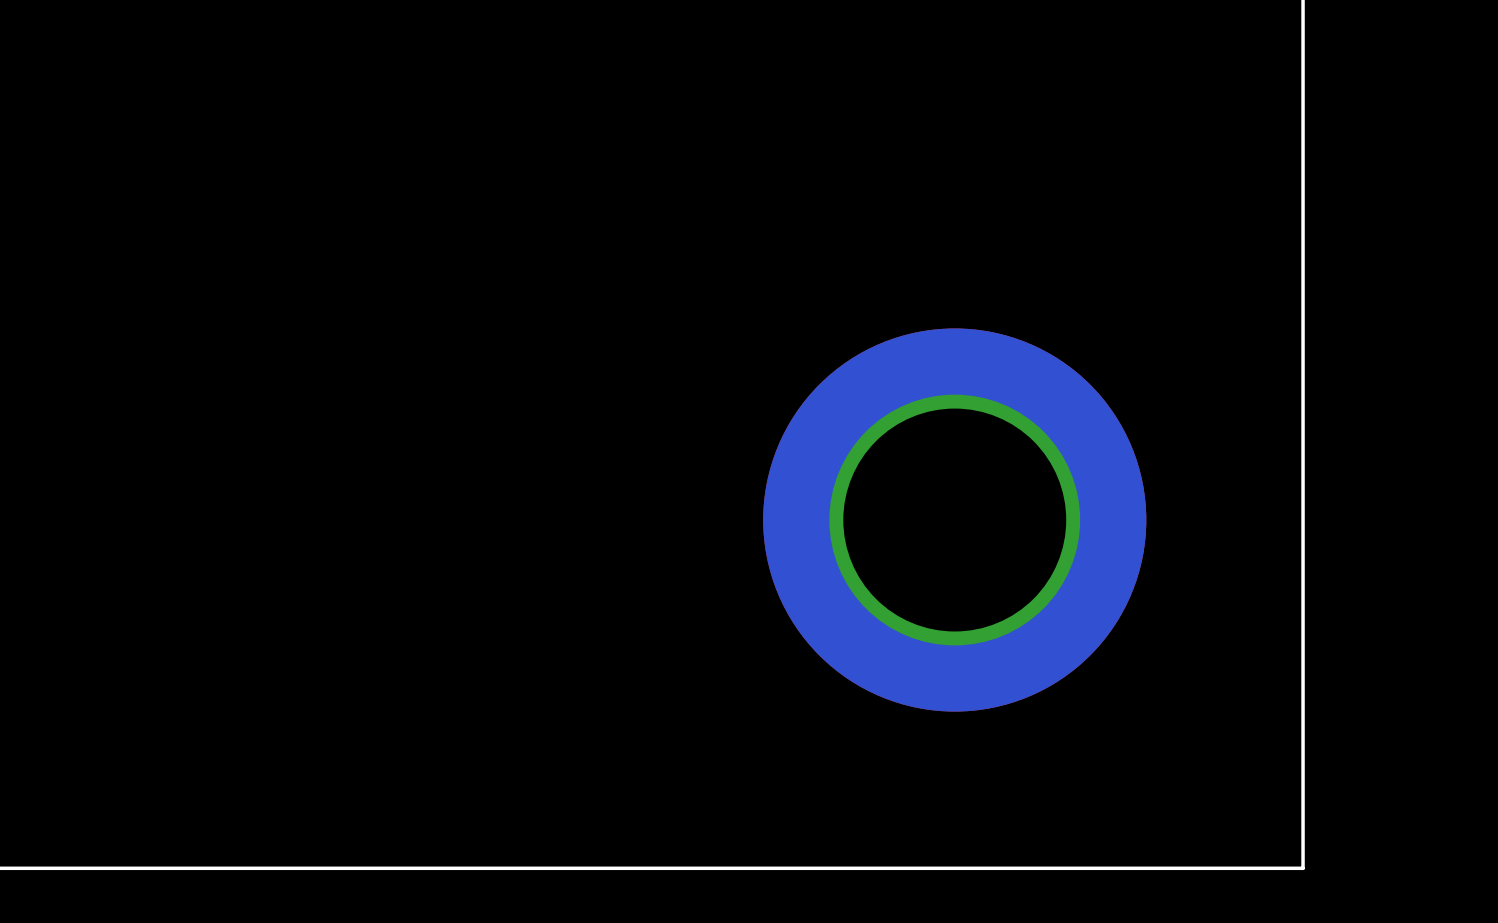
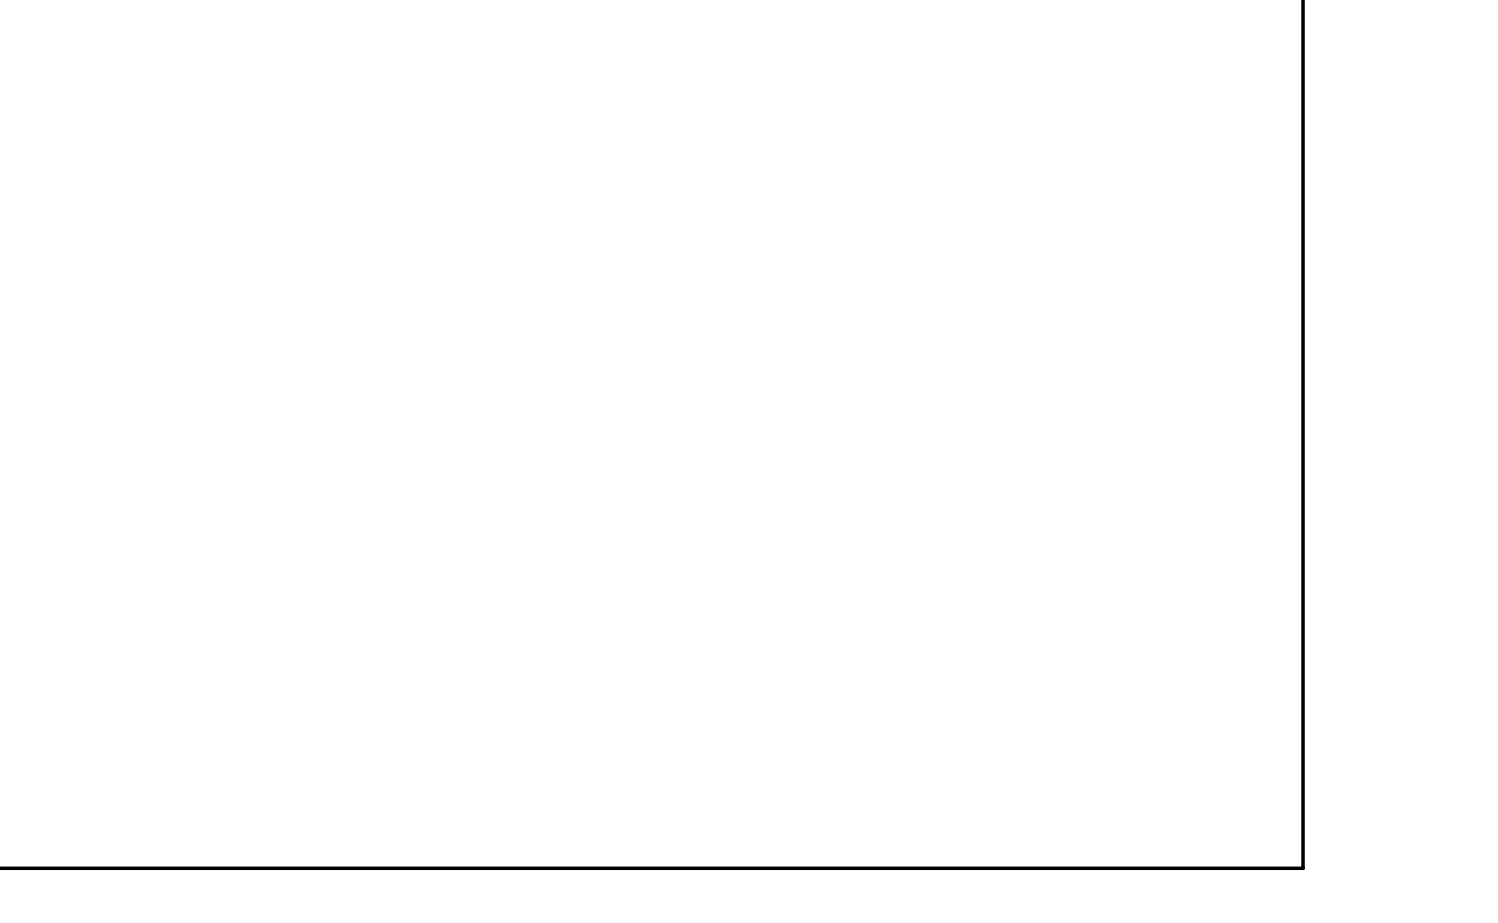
part: (954, 520) -> none

